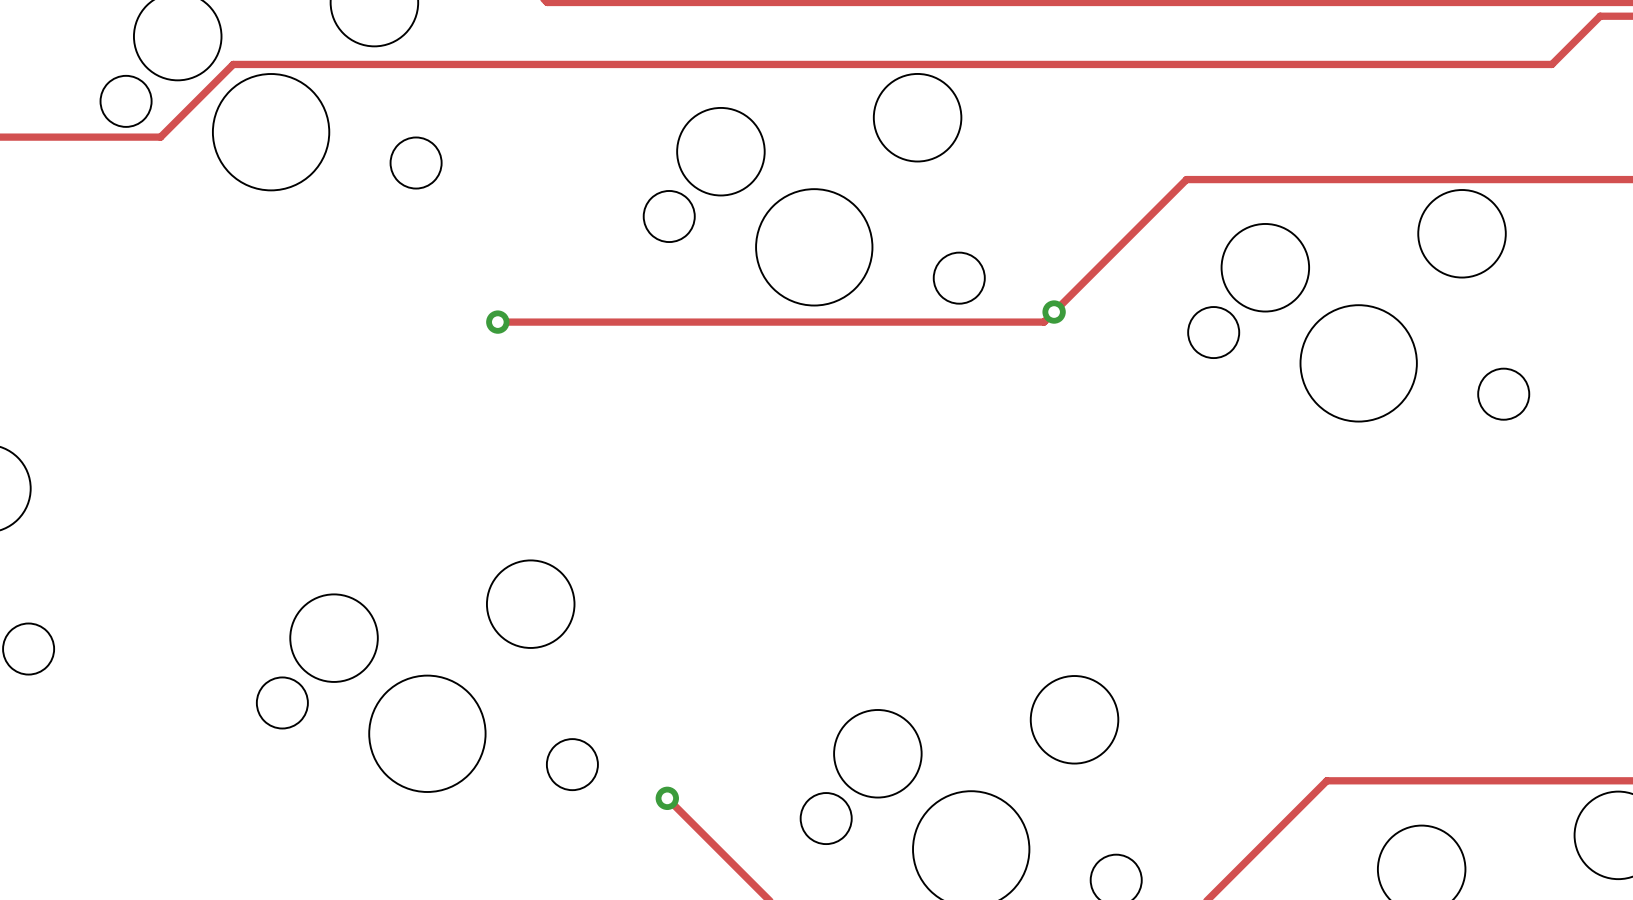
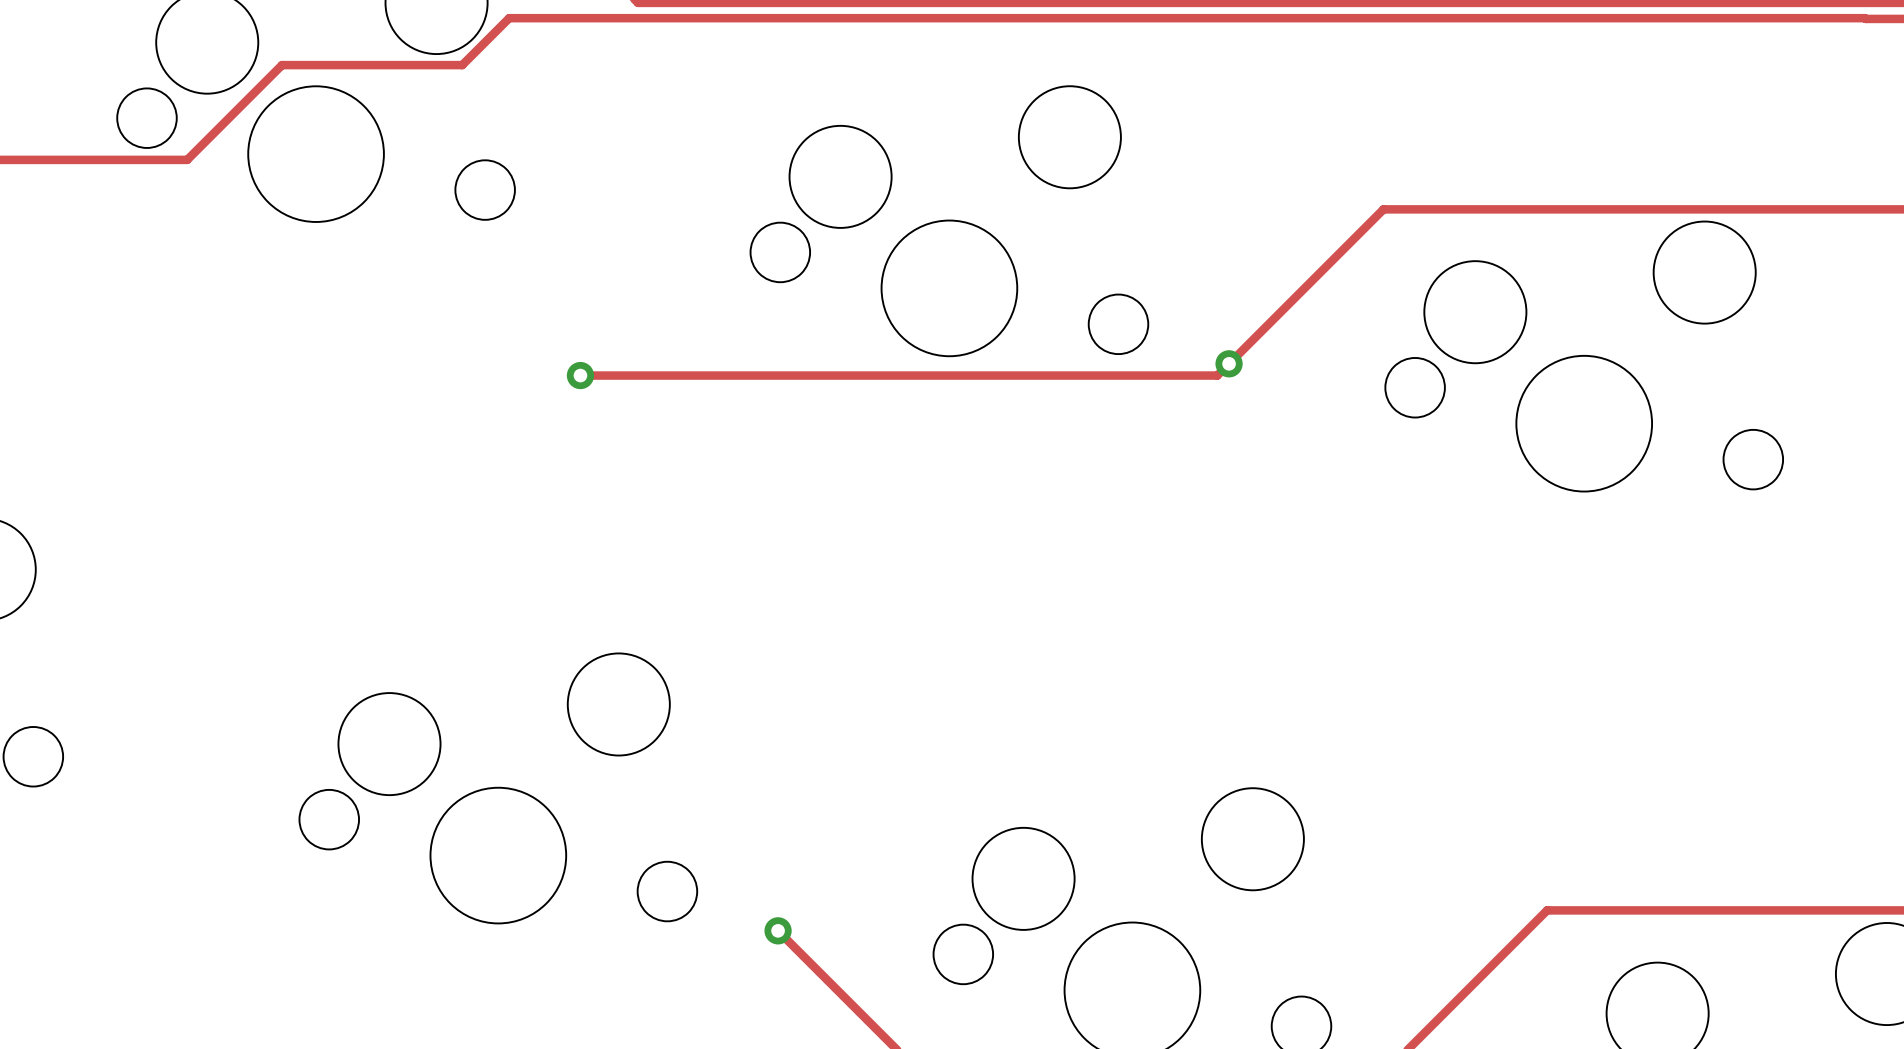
track: (1600, 16) (1551, 64) (233, 64) -> (1865, 18) (509, 18) (462, 65) (282, 65) (271, 75)

